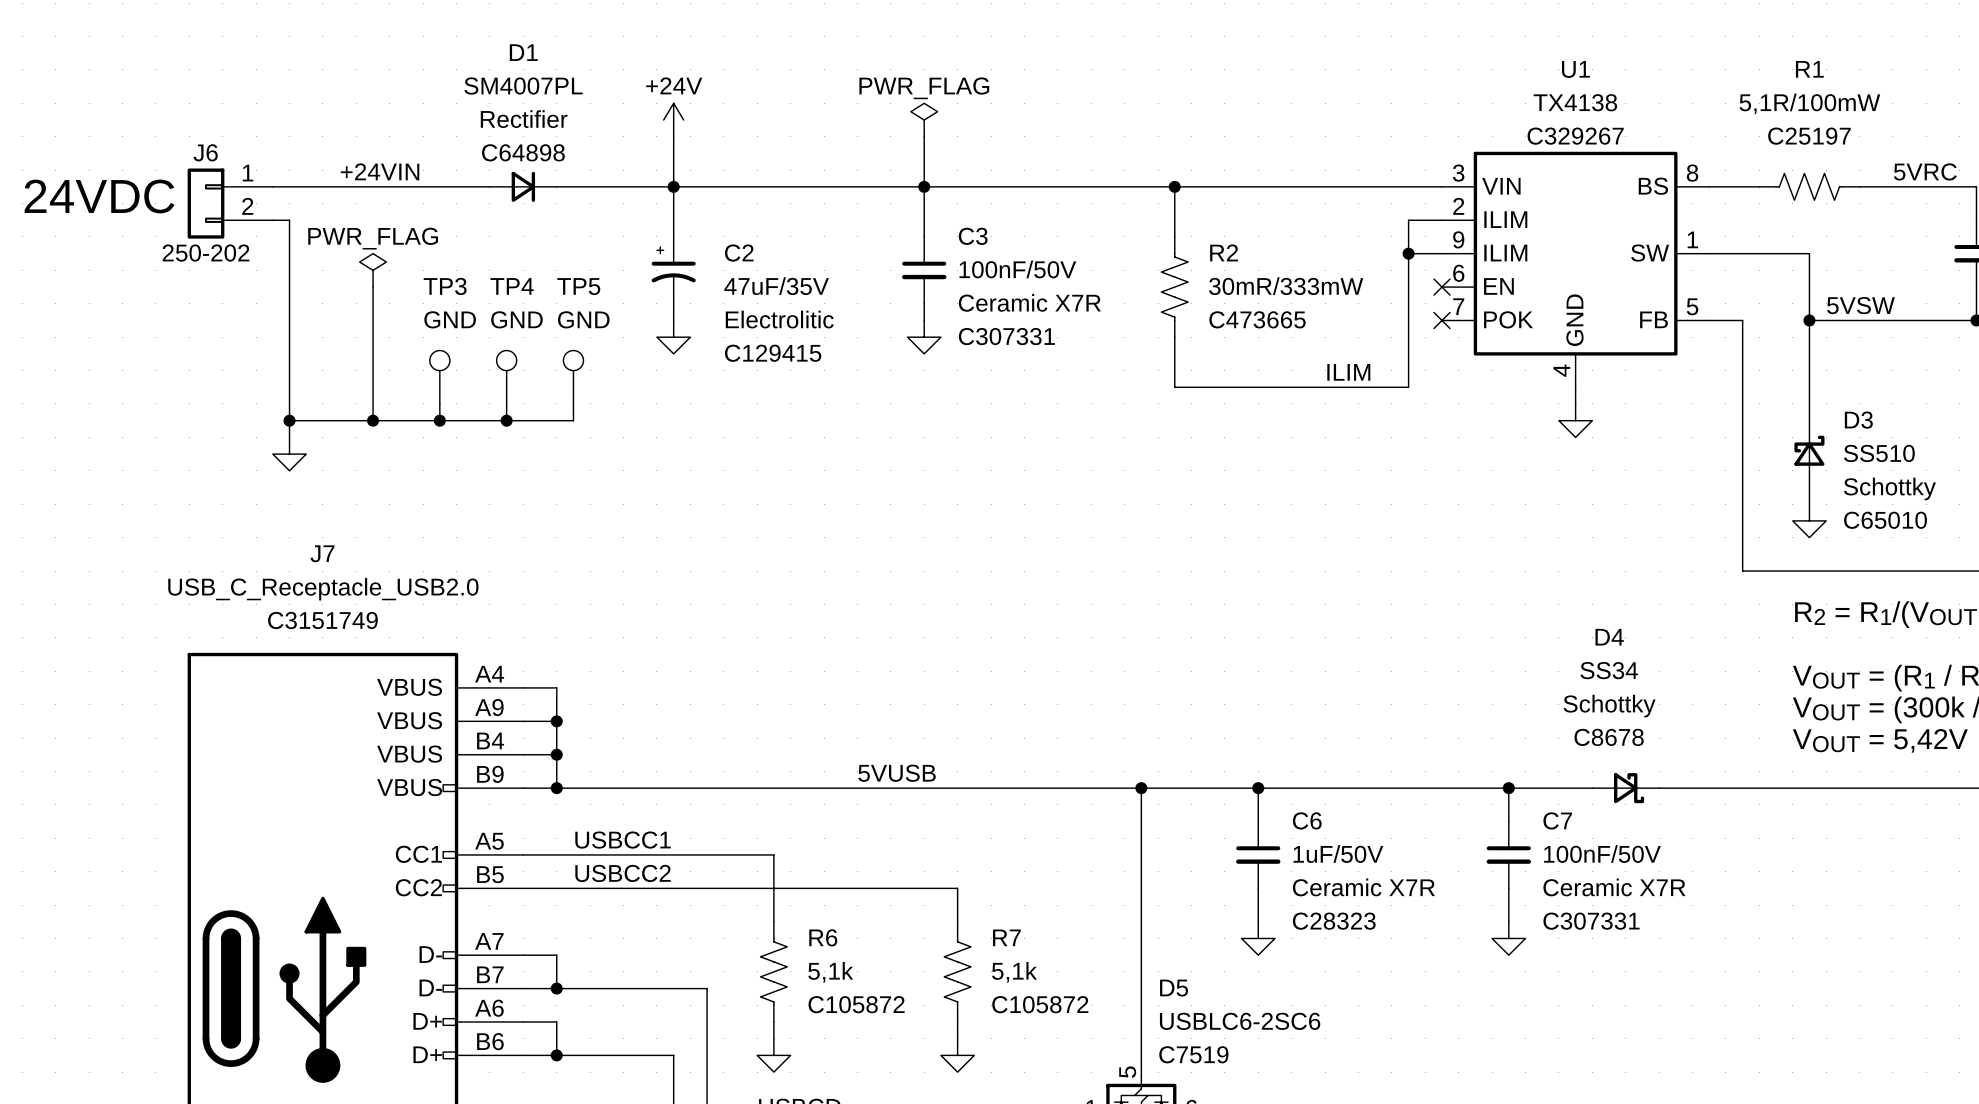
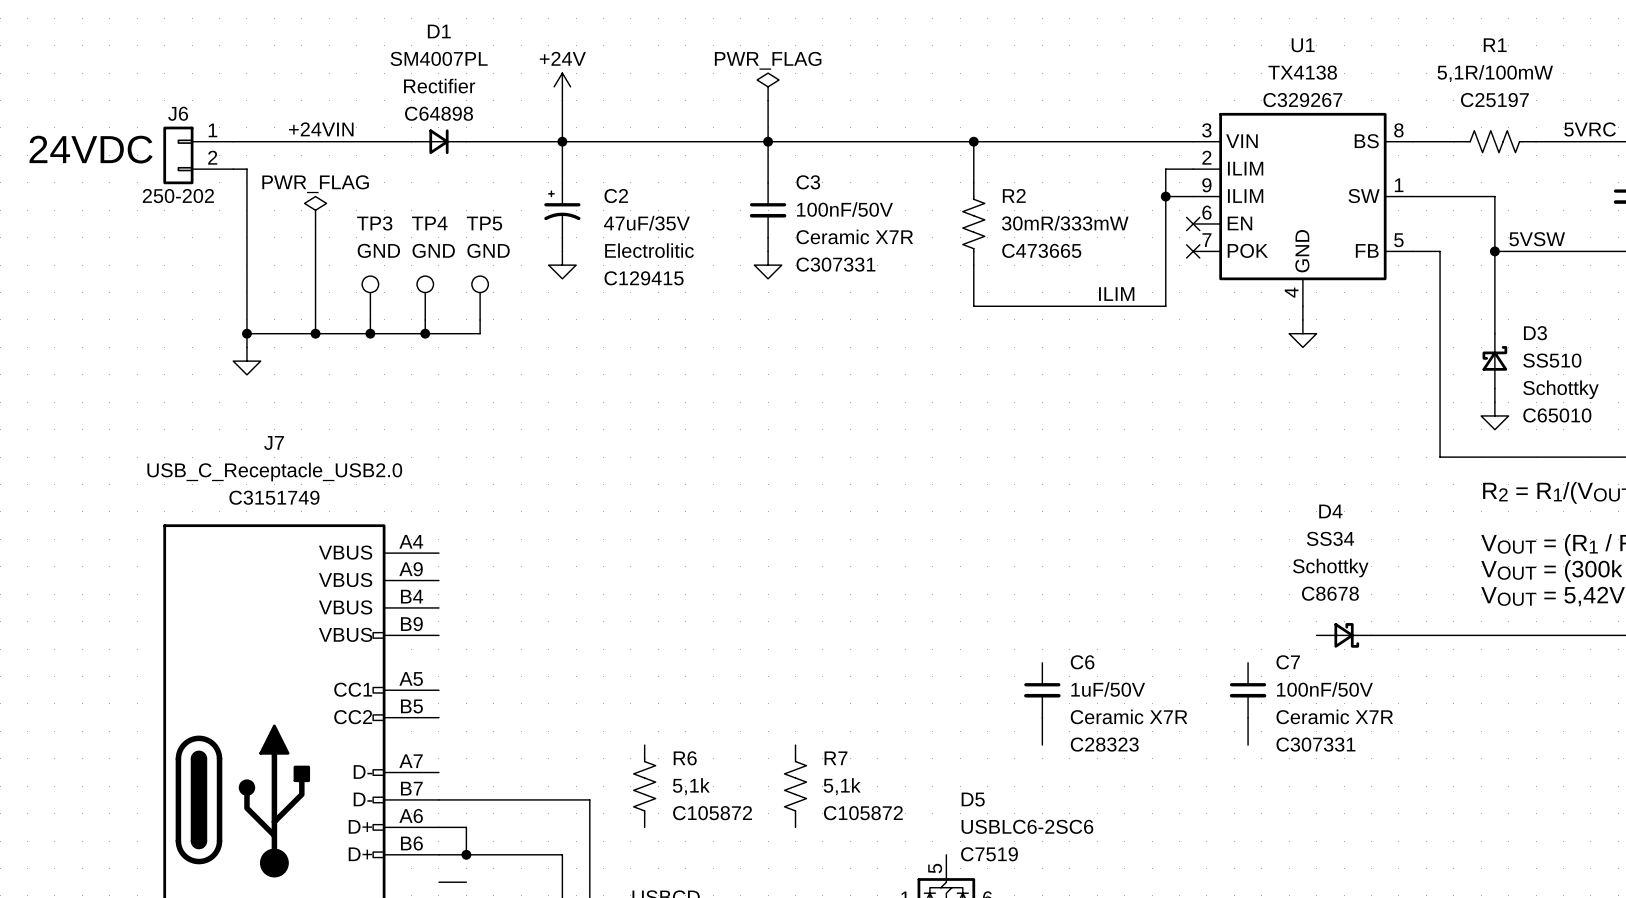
wire: (523, 687) (556, 687) (556, 788) -> none
wire: (523, 721) (556, 721) -> none
junction: (556, 721) -> none
wire: (523, 754) (556, 754) -> none
junction: (556, 754) -> none
label: 5VUSB (897, 773) -> none
wire: (523, 788) (1592, 788) -> none
junction: (556, 788) -> none
wire: (1141, 788) (1141, 1055) -> none
junction: (1141, 788) -> none
wire: (1258, 788) (1258, 821) -> none
junction: (1258, 788) -> none
wire: (1508, 788) (1508, 821) -> none
junction: (1508, 788) -> none
label: USBCC1 (623, 840) -> none
wire: (523, 854) (773, 854) (773, 921) -> none
label: USBCC2 (623, 873) -> none
wire: (523, 888) (957, 888) (957, 921) -> none
power symbol: (1258, 938) -> none
power symbol: (1508, 938) -> none
wire: (523, 955) (556, 955) (556, 988) -> none
junction: (556, 988) -> none
wire: (773, 1021) (773, 1038) -> none
wire: (957, 1021) (957, 1038) -> none
power symbol: (773, 1055) -> none
power symbol: (957, 1055) -> none
wire: none -> (438, 882) (466, 882)

